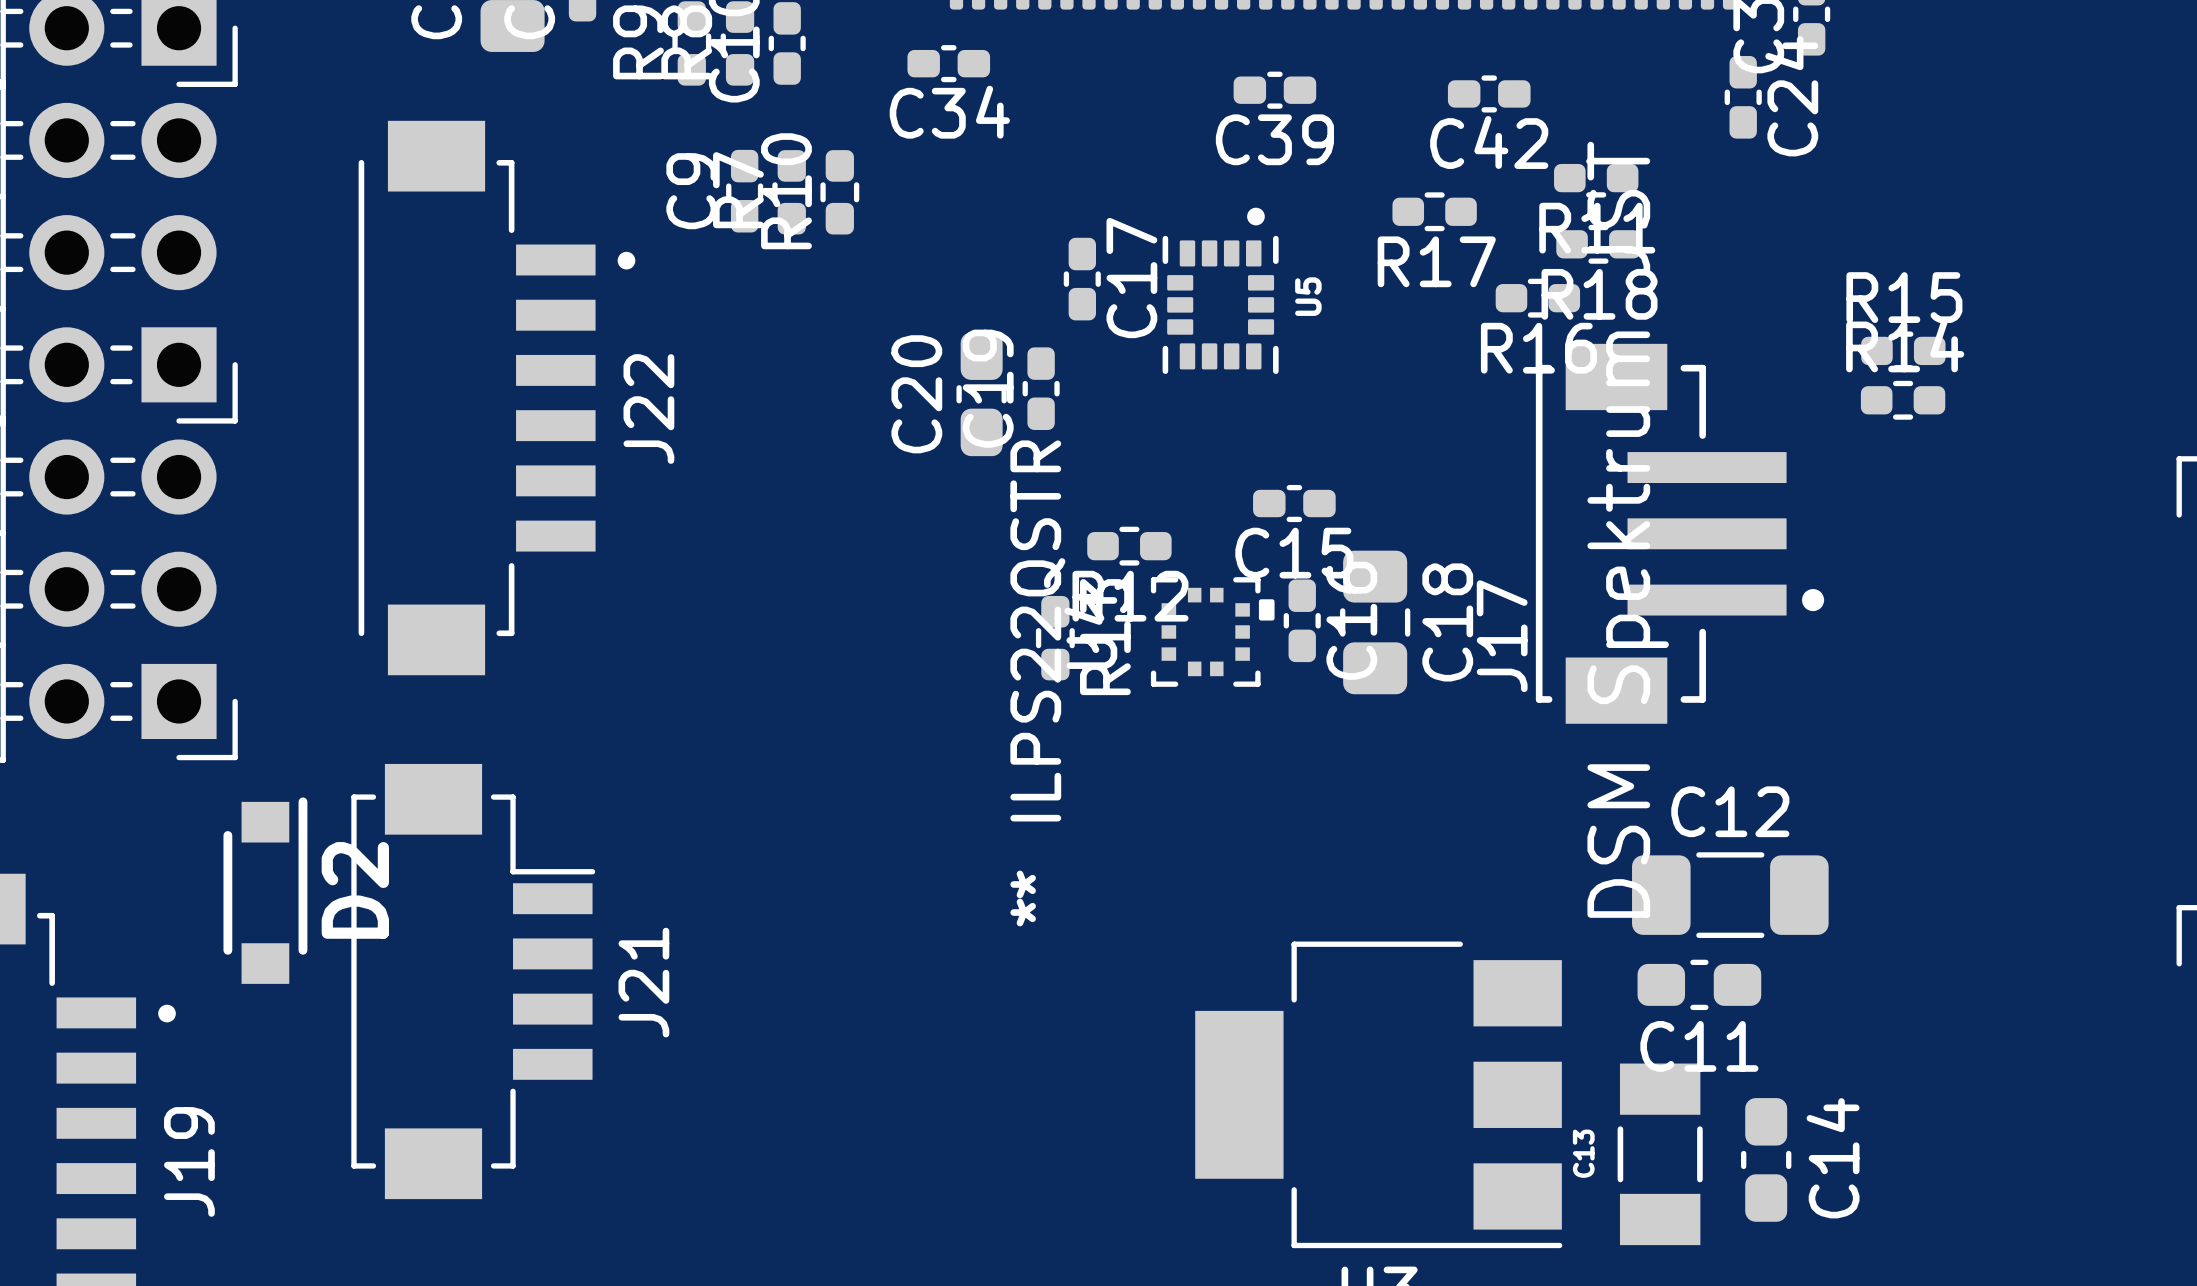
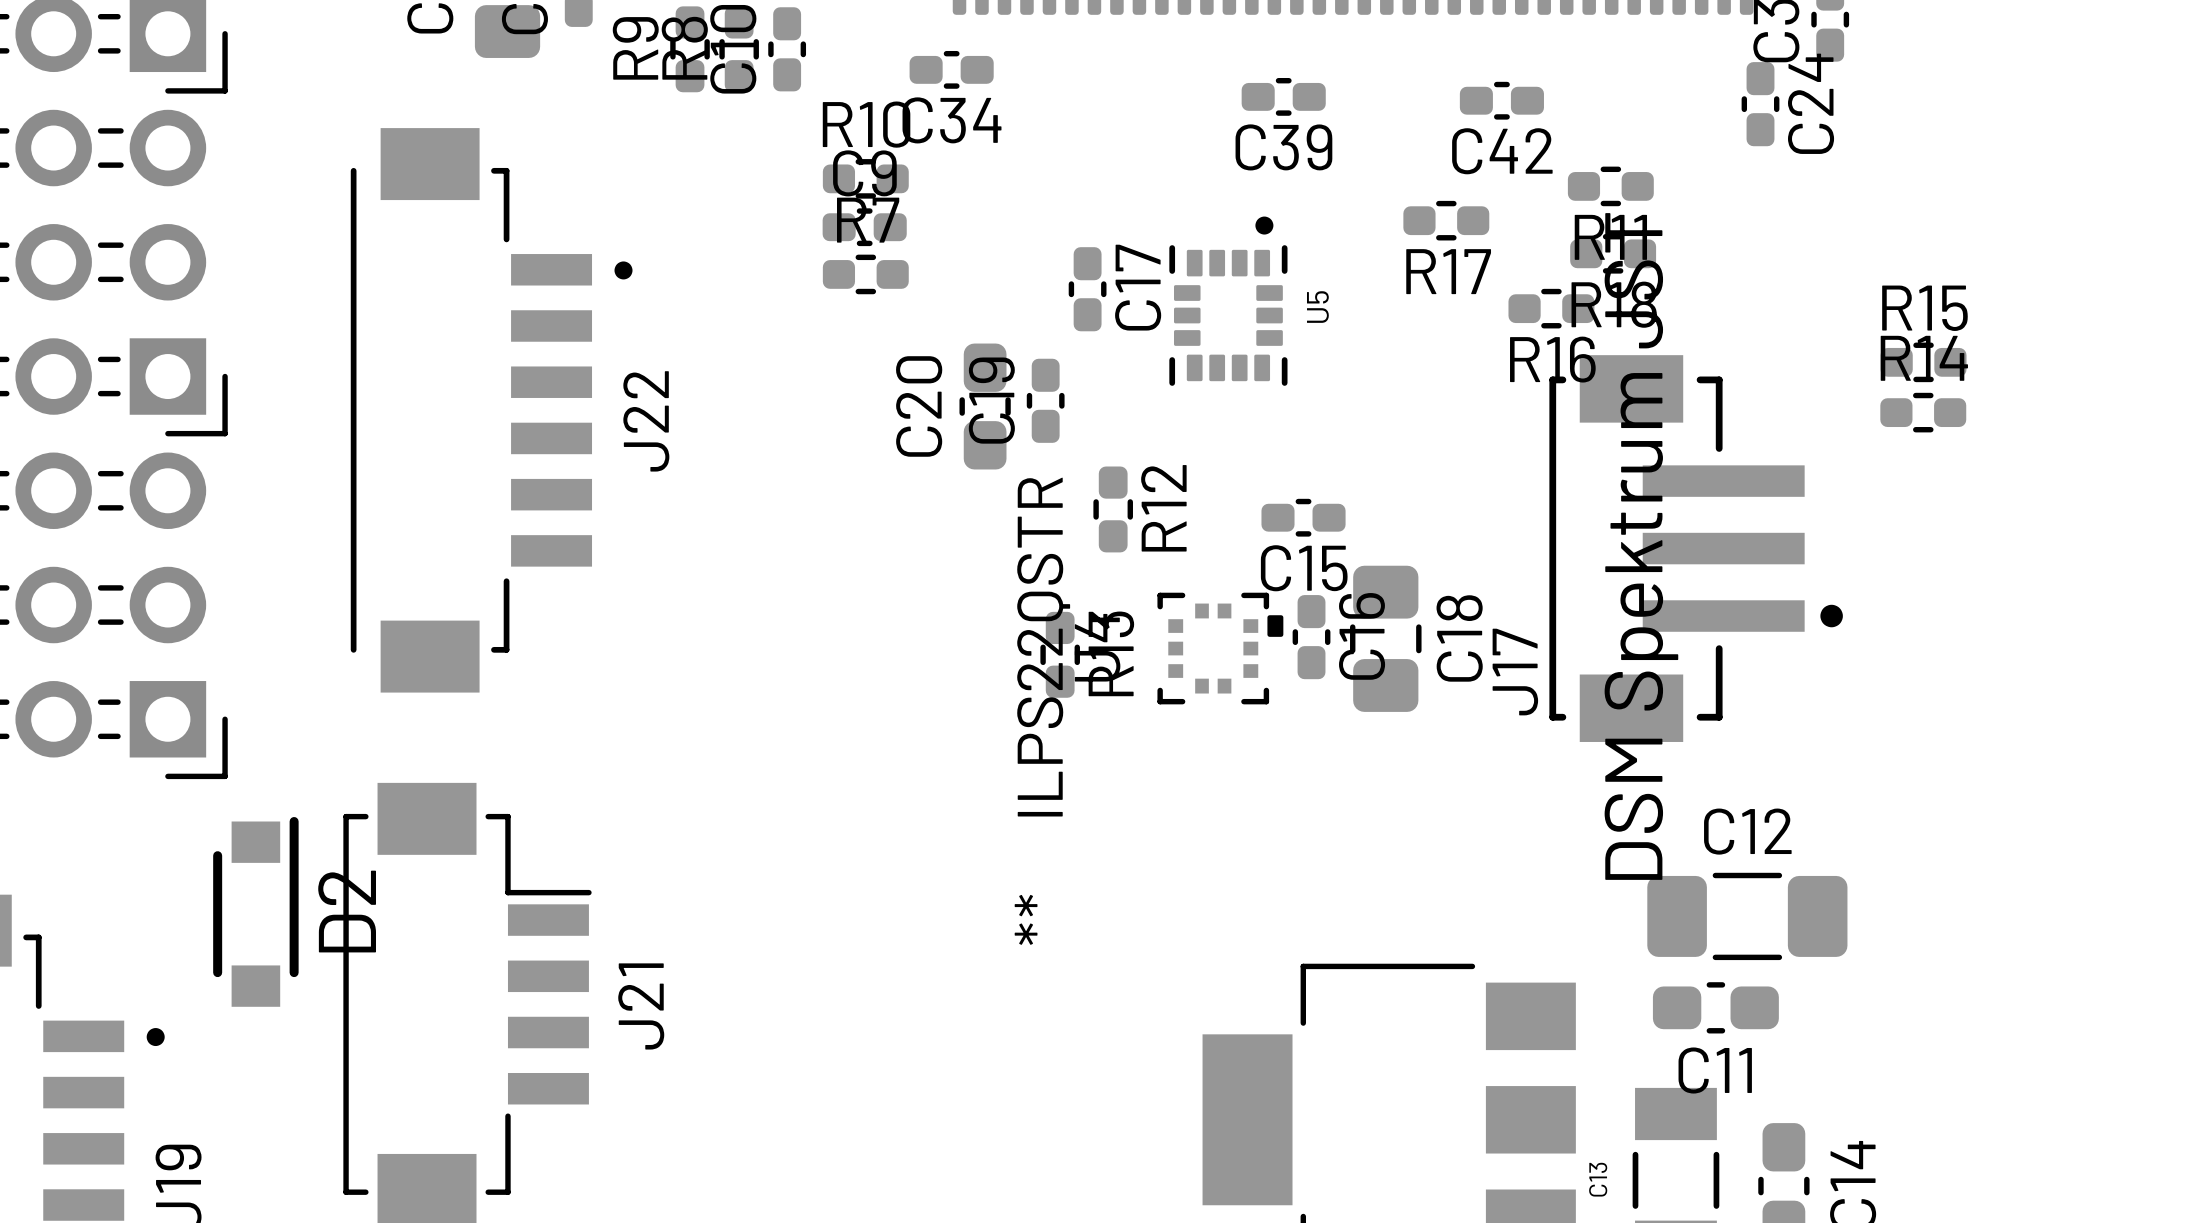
C9 rotation: 0° (744, 191) -> 90° clockwise (864, 227)
C9 position: (744, 191) -> (864, 227)
R7 rotation: 0° (791, 192) -> 90° clockwise (865, 274)
R7 position: (791, 192) -> (865, 274)
R10 rotation: 0° (839, 192) -> 90° clockwise (865, 178)
R12 rotation: 0° (1129, 546) -> 90° clockwise (1113, 509)
R12 position: (1129, 546) -> (1113, 509)

